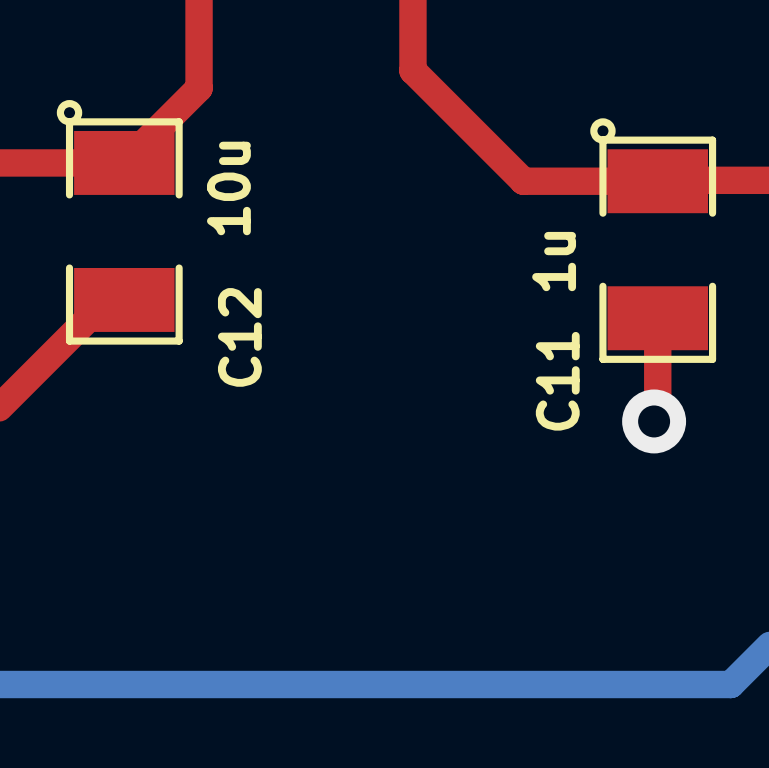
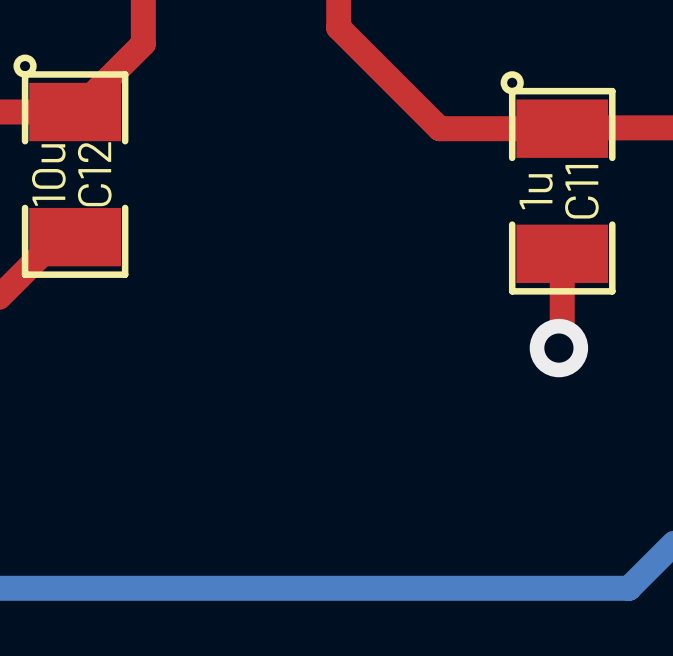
C12 value position: 10u (228, 188) -> 10u (48, 175)
C11 value position: 1u (554, 261) -> 1u (536, 191)
C12 name position: C12 (239, 337) -> C12 (94, 174)
C11 name position: C11 (557, 381) -> C11 (581, 191)

